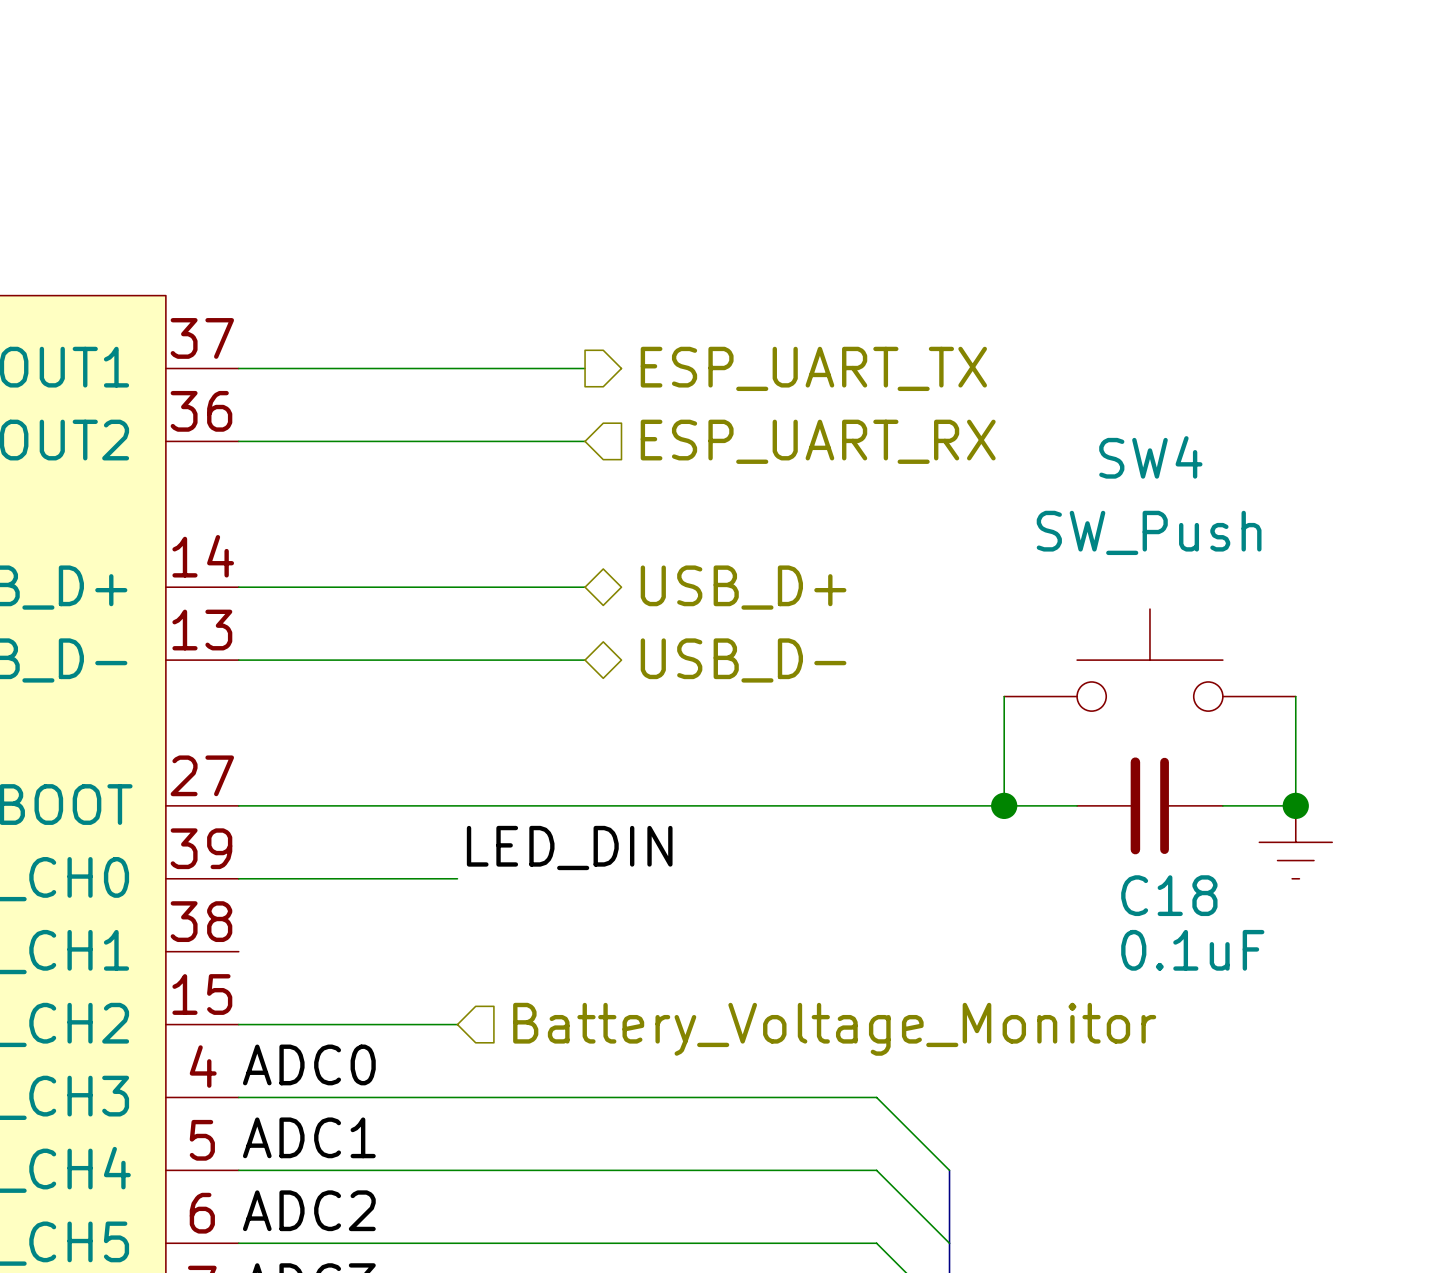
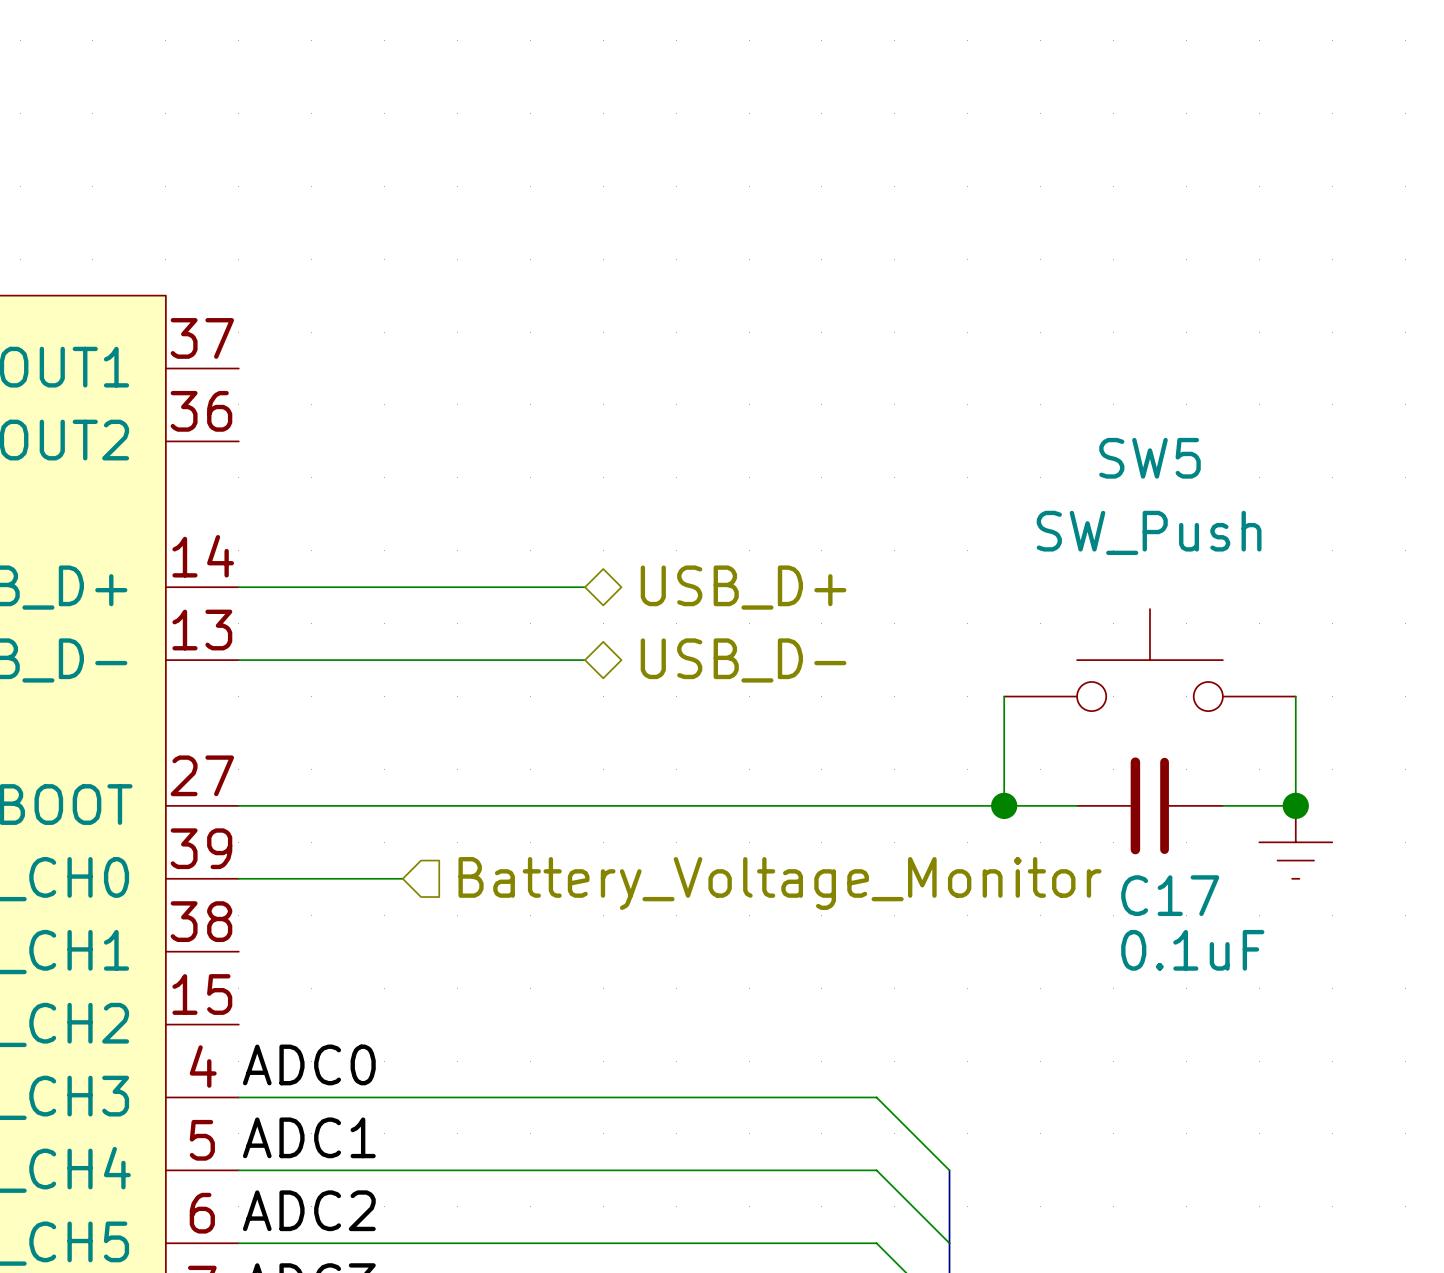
wire: (238, 368) (585, 368) -> none
hierarchical label: ESP_UART_TX (813, 368) -> none
wire: (238, 441) (585, 441) -> none
hierarchical label: ESP_UART_RX (818, 441) -> none
SW4 name: SW4 (1150, 457) -> SW5 (1149, 458)
label: LED_DIN (569, 847) -> none
wire: (402, 878) (457, 878) -> none
C18 name: C18 (1169, 895) -> C17 (1170, 895)
wire: (238, 1024) (457, 1024) -> none
hierarchical label position: Battery_Voltage_Monitor (834, 1029) -> Battery_Voltage_Monitor (780, 883)

